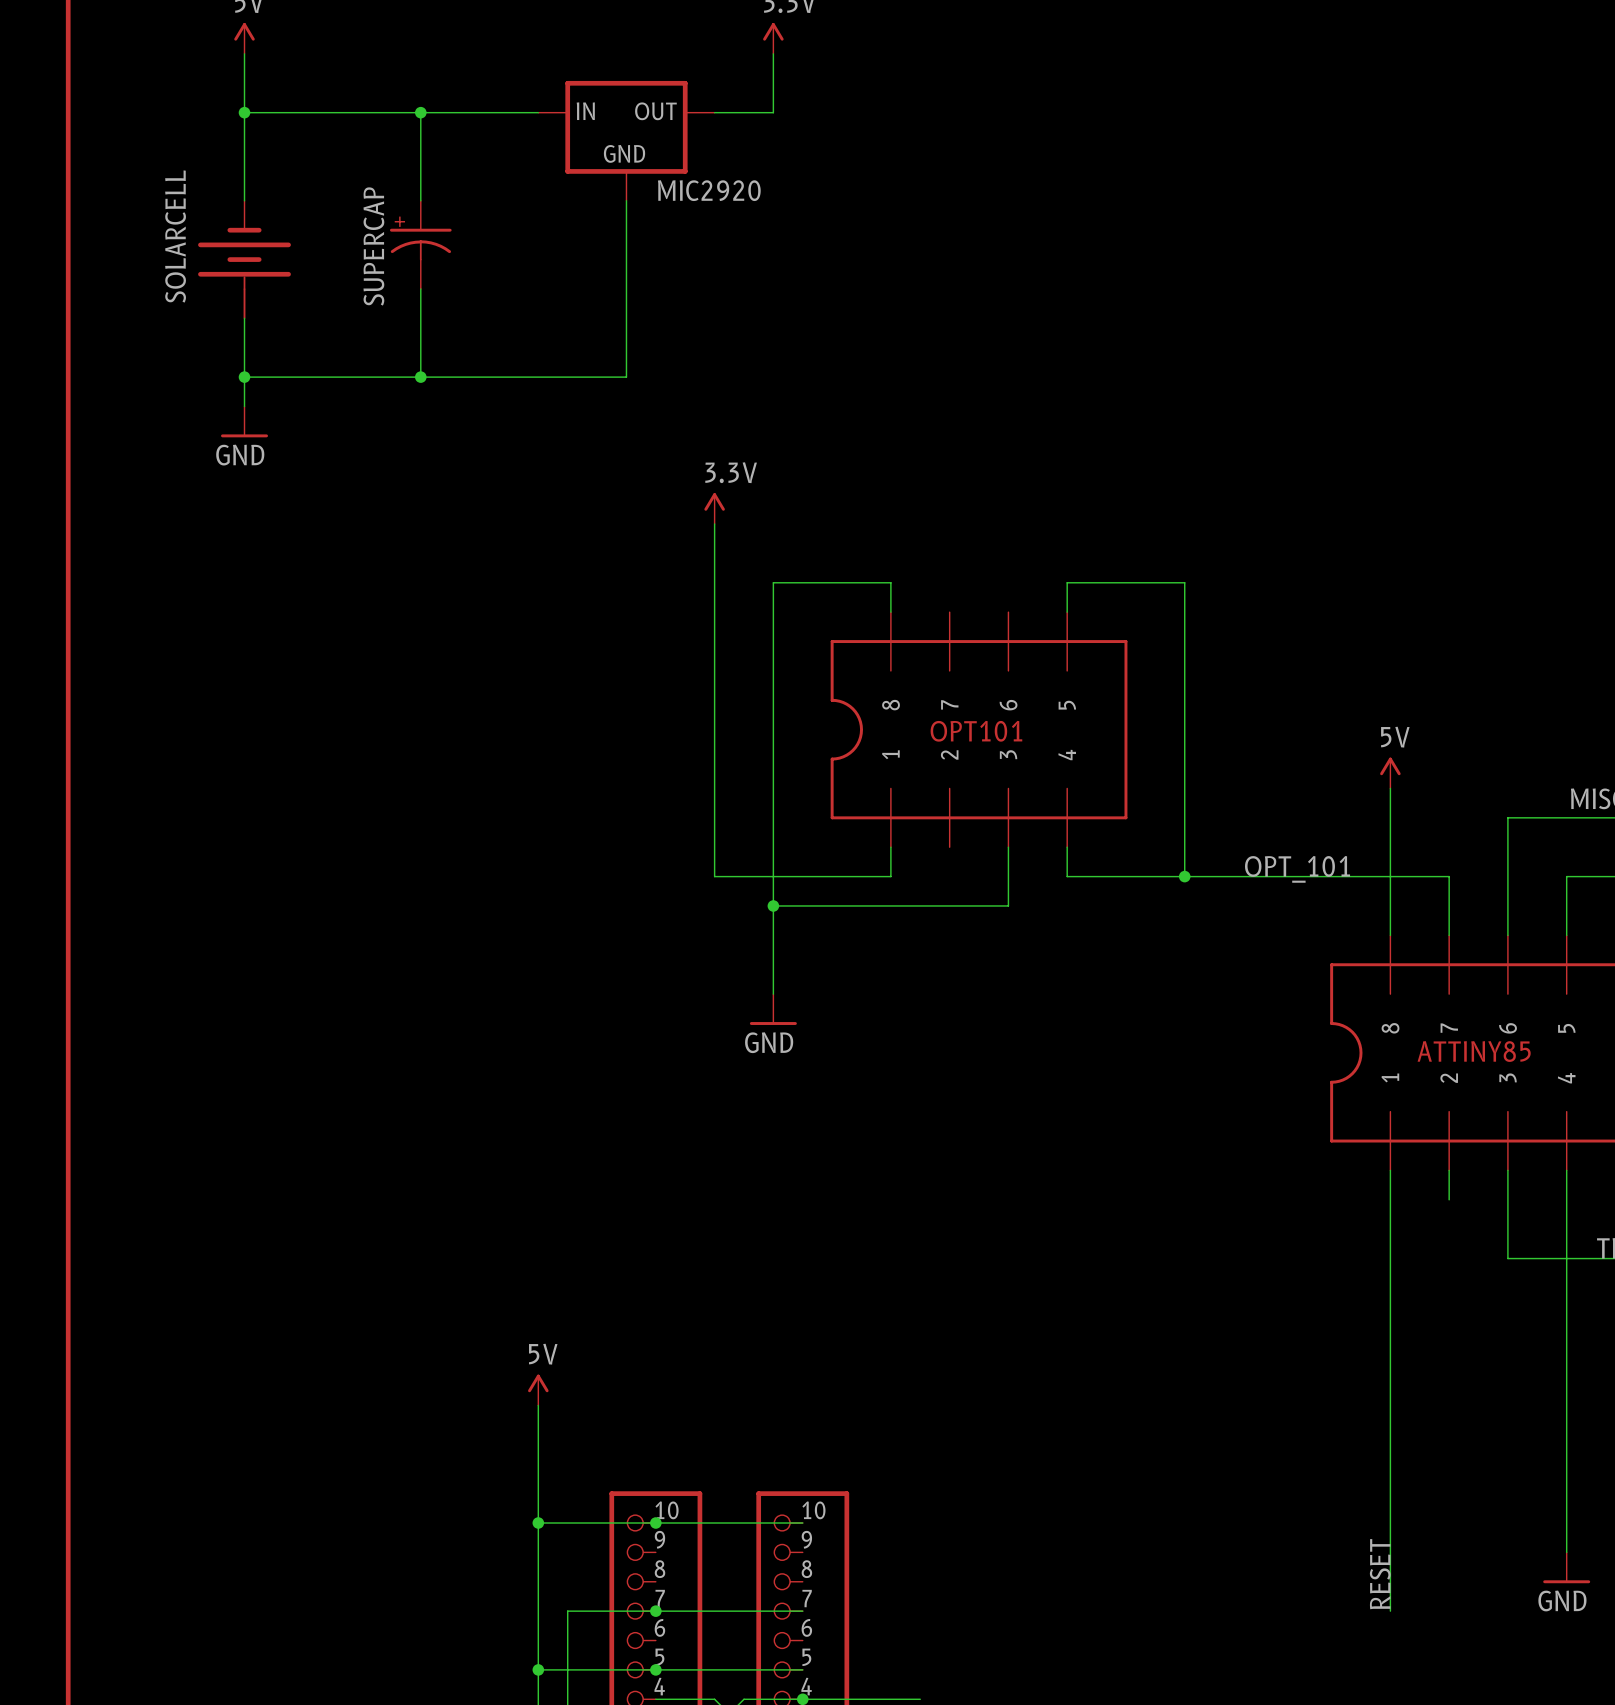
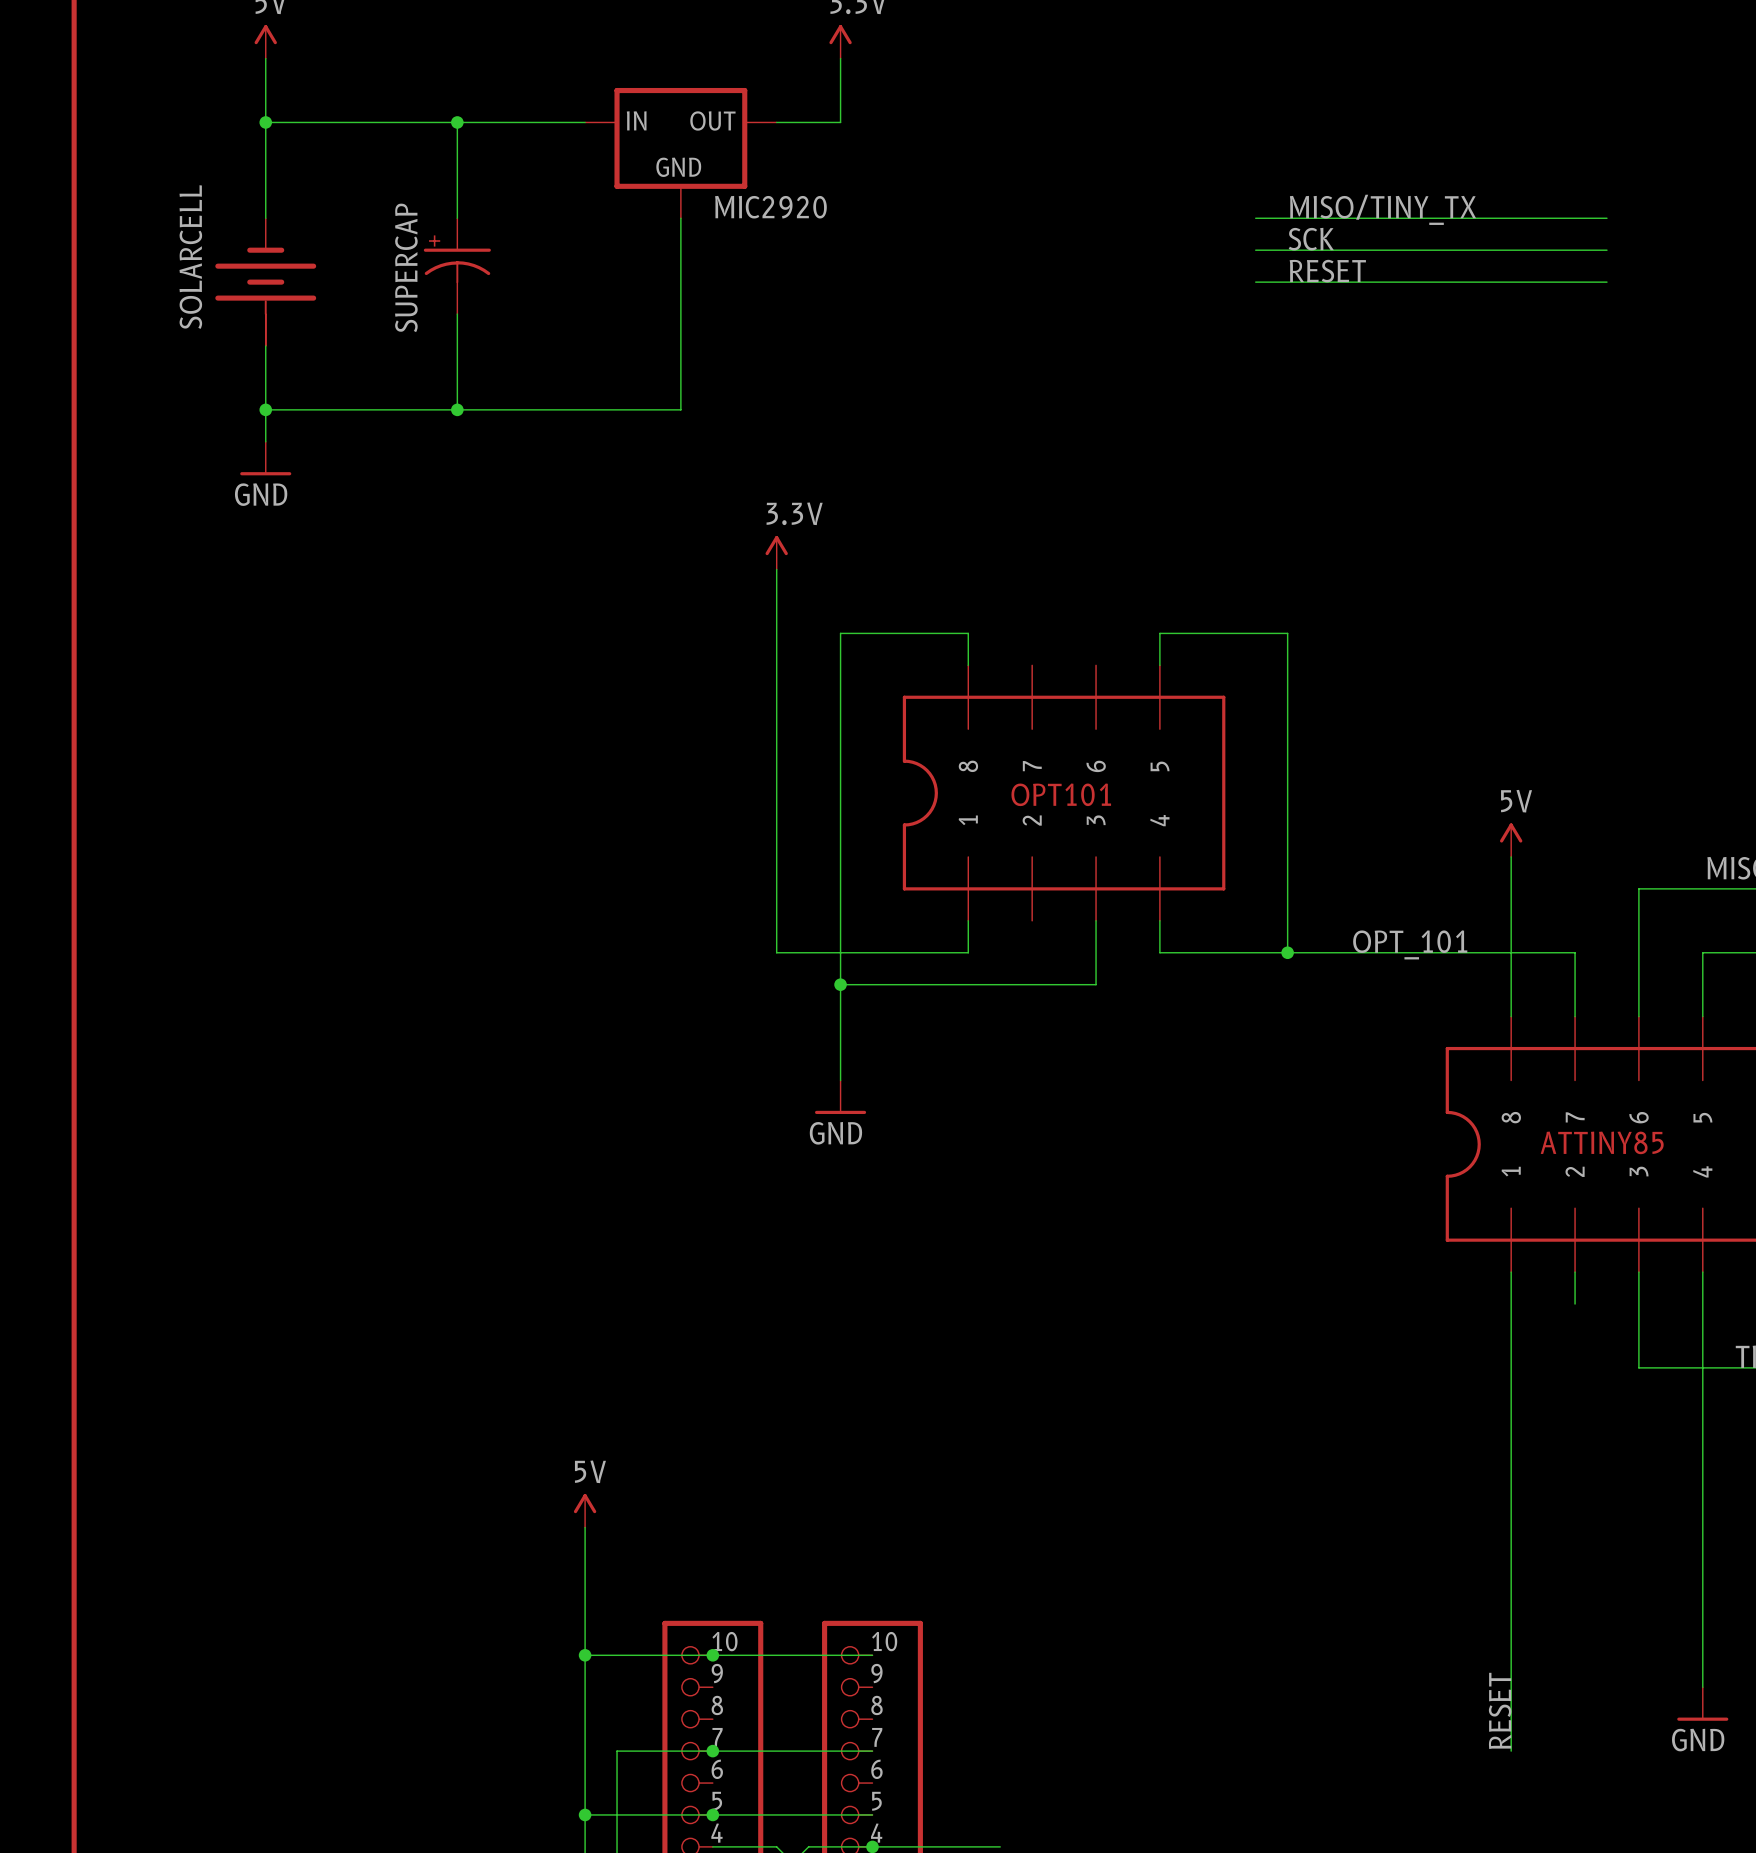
label: none -> MISO/TINY_TX (1382, 209)
wire: none -> (1255, 218) (1606, 218)
label: none -> SCK (1311, 239)
wire: none -> (1255, 250) (1606, 250)
label: none -> RESET (1327, 271)
wire: none -> (1255, 282) (1606, 282)

